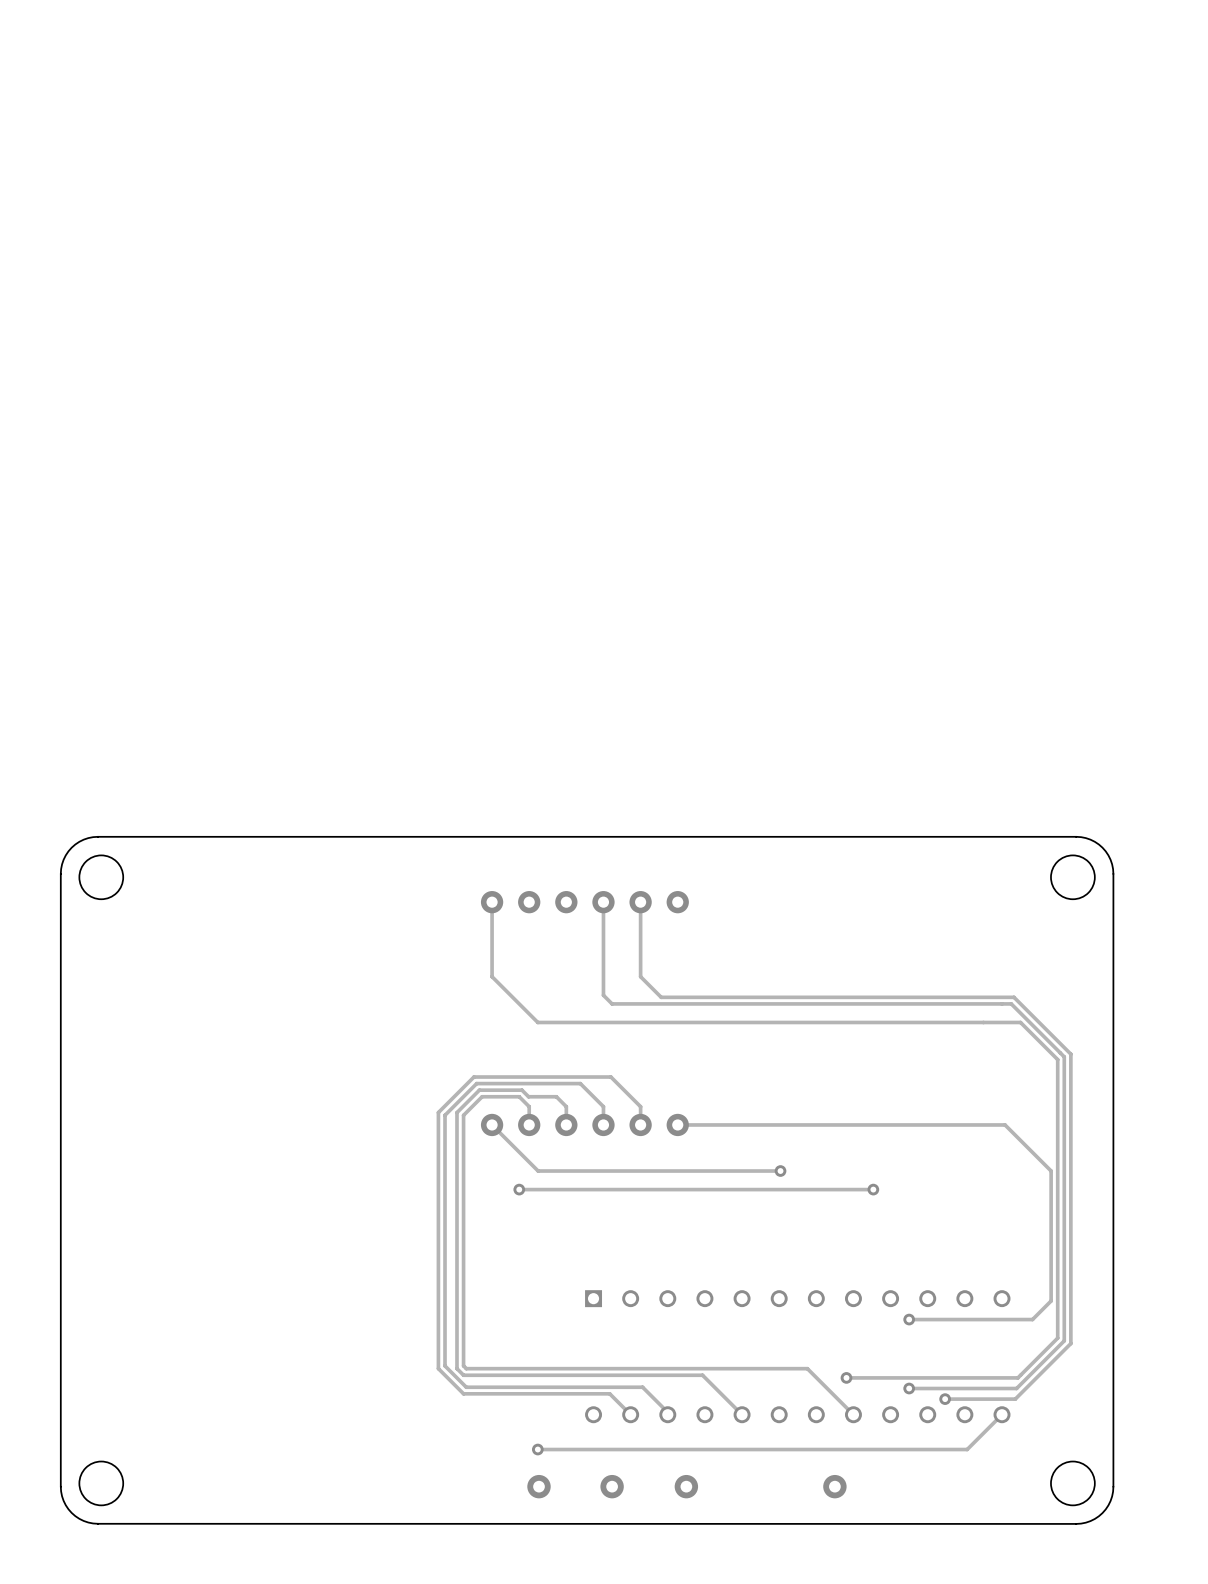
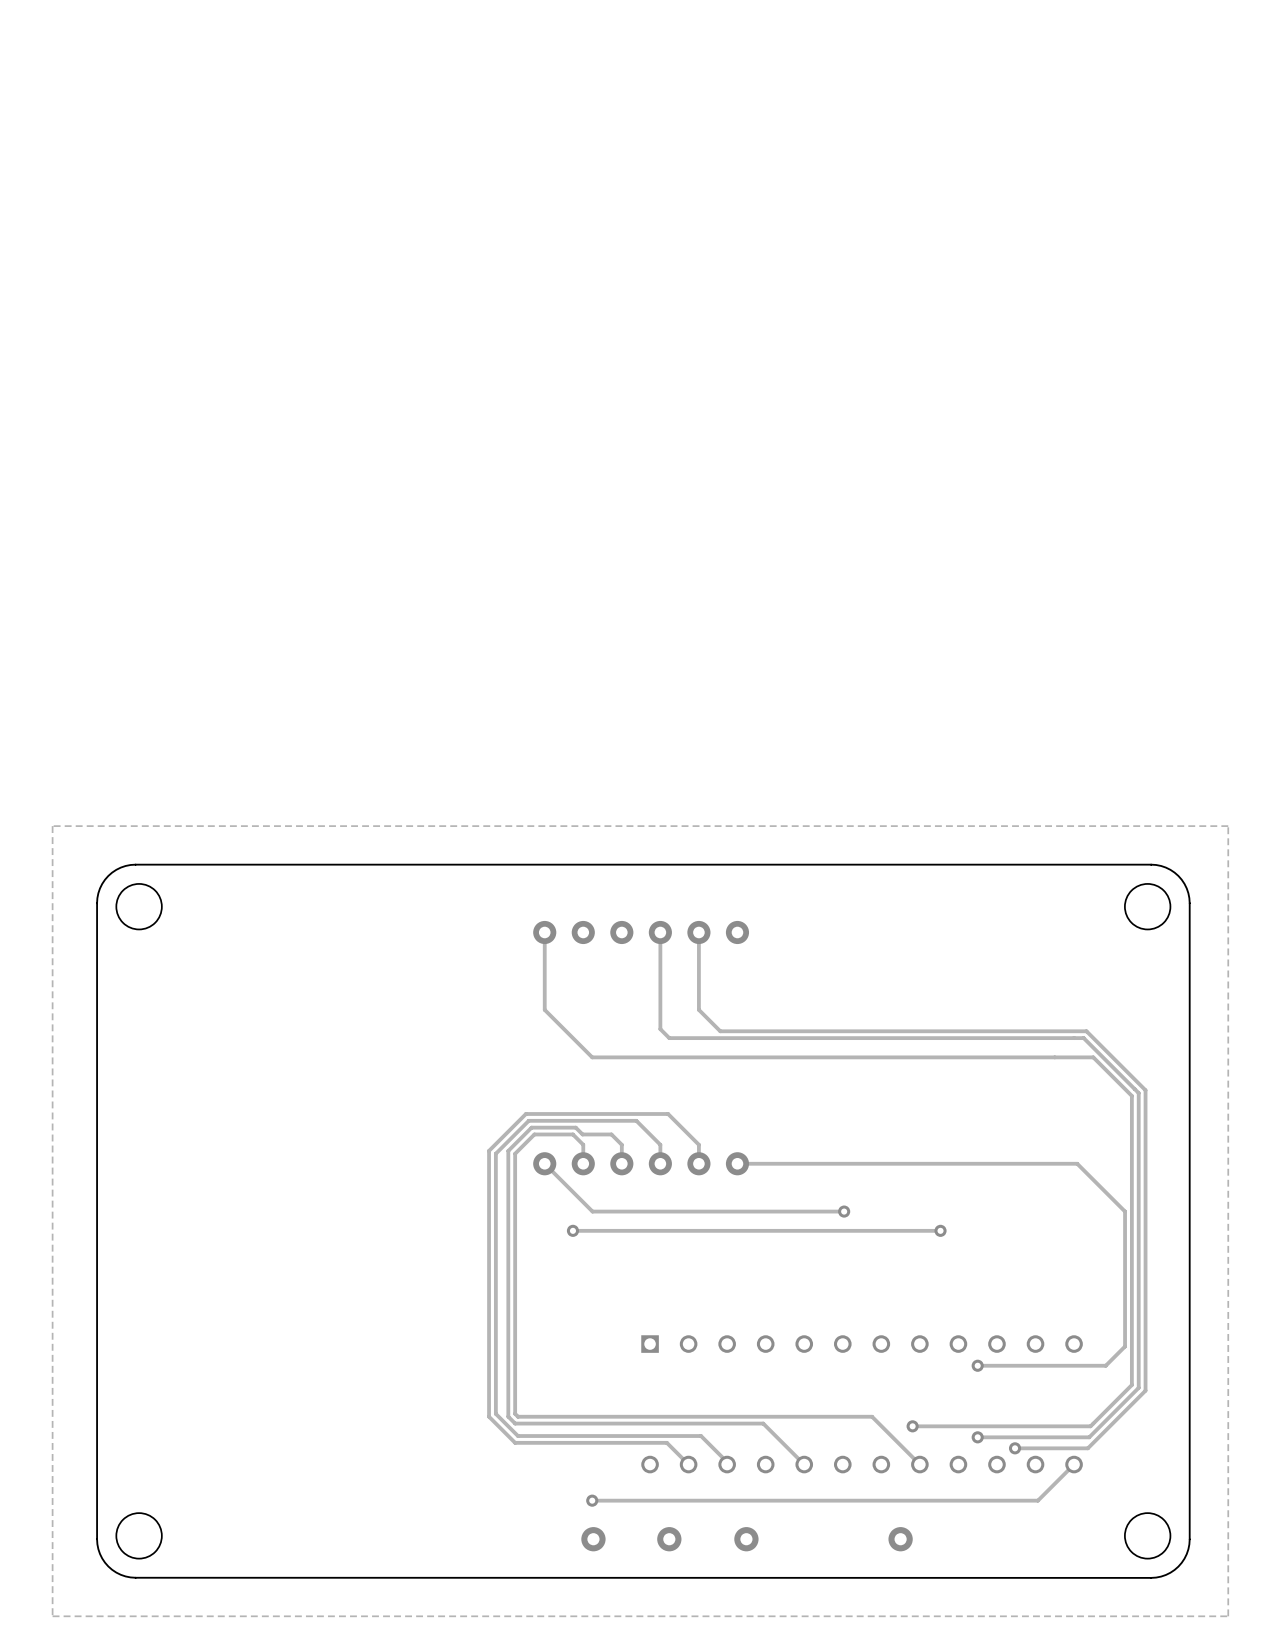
zone outline: none -> (1228, 826) (1228, 1616) (52, 1616) (52, 826) (1228, 826)

